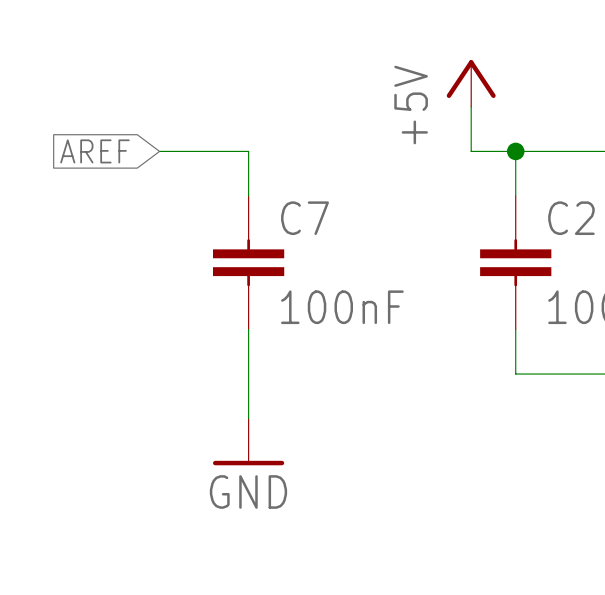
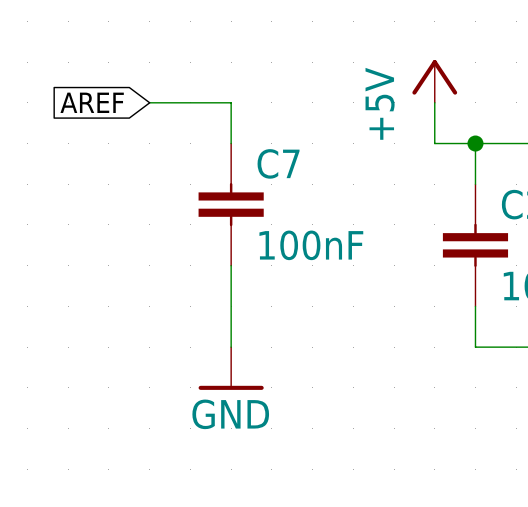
global label position: AREF (94, 151) -> AREF (92, 102)
wire: (159, 151) (248, 151) (248, 195) -> (149, 102) (231, 102) (231, 143)
C7 position: (248, 262) -> (231, 204)
power symbol position: GND (248, 441) -> GND (231, 368)

